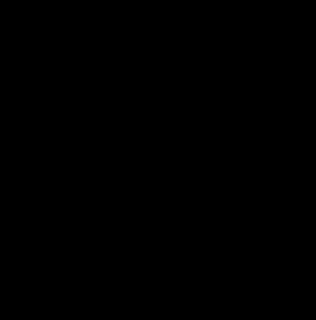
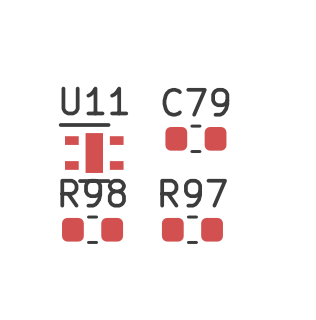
C79: none -> (195, 138)
U11: none -> (91, 153)
R98: none -> (92, 229)
R97: none -> (192, 229)

